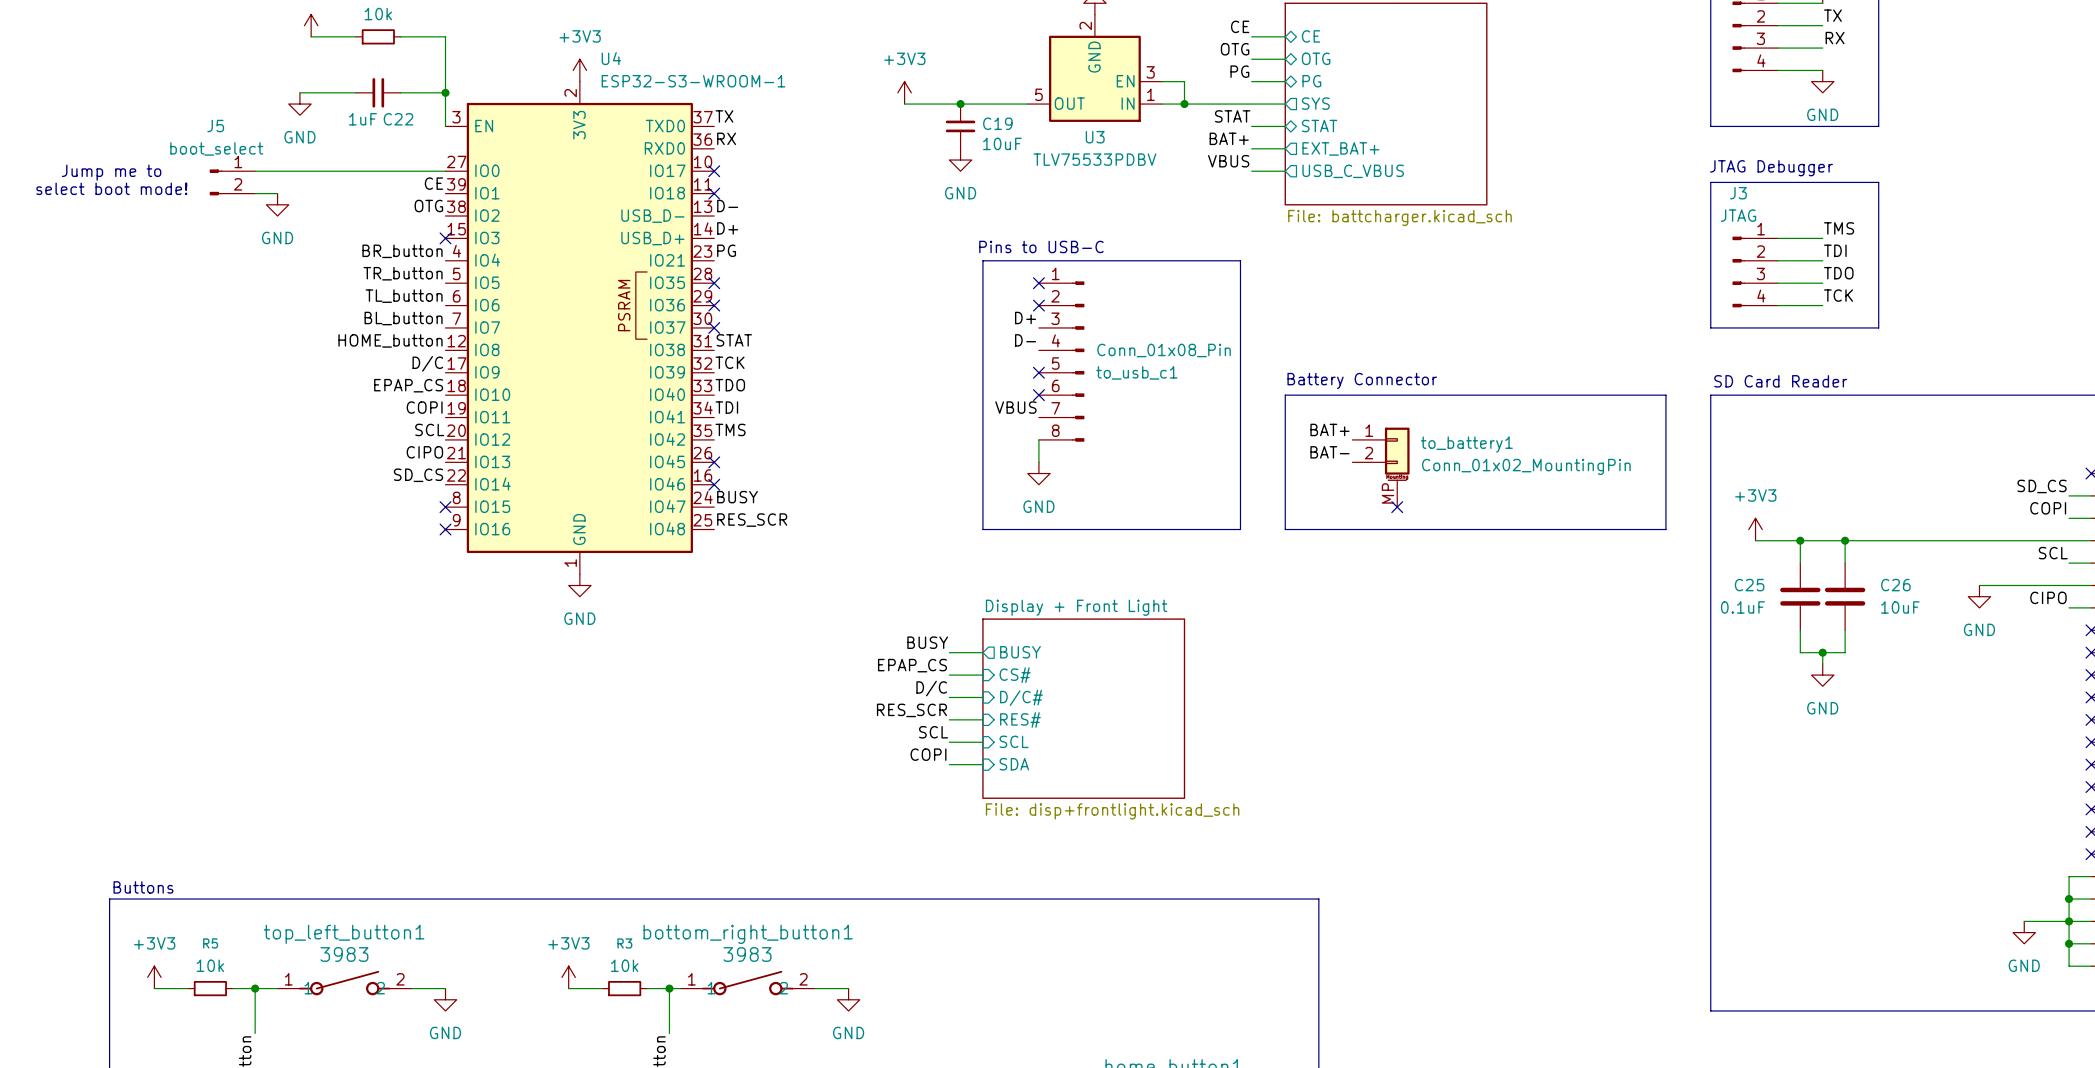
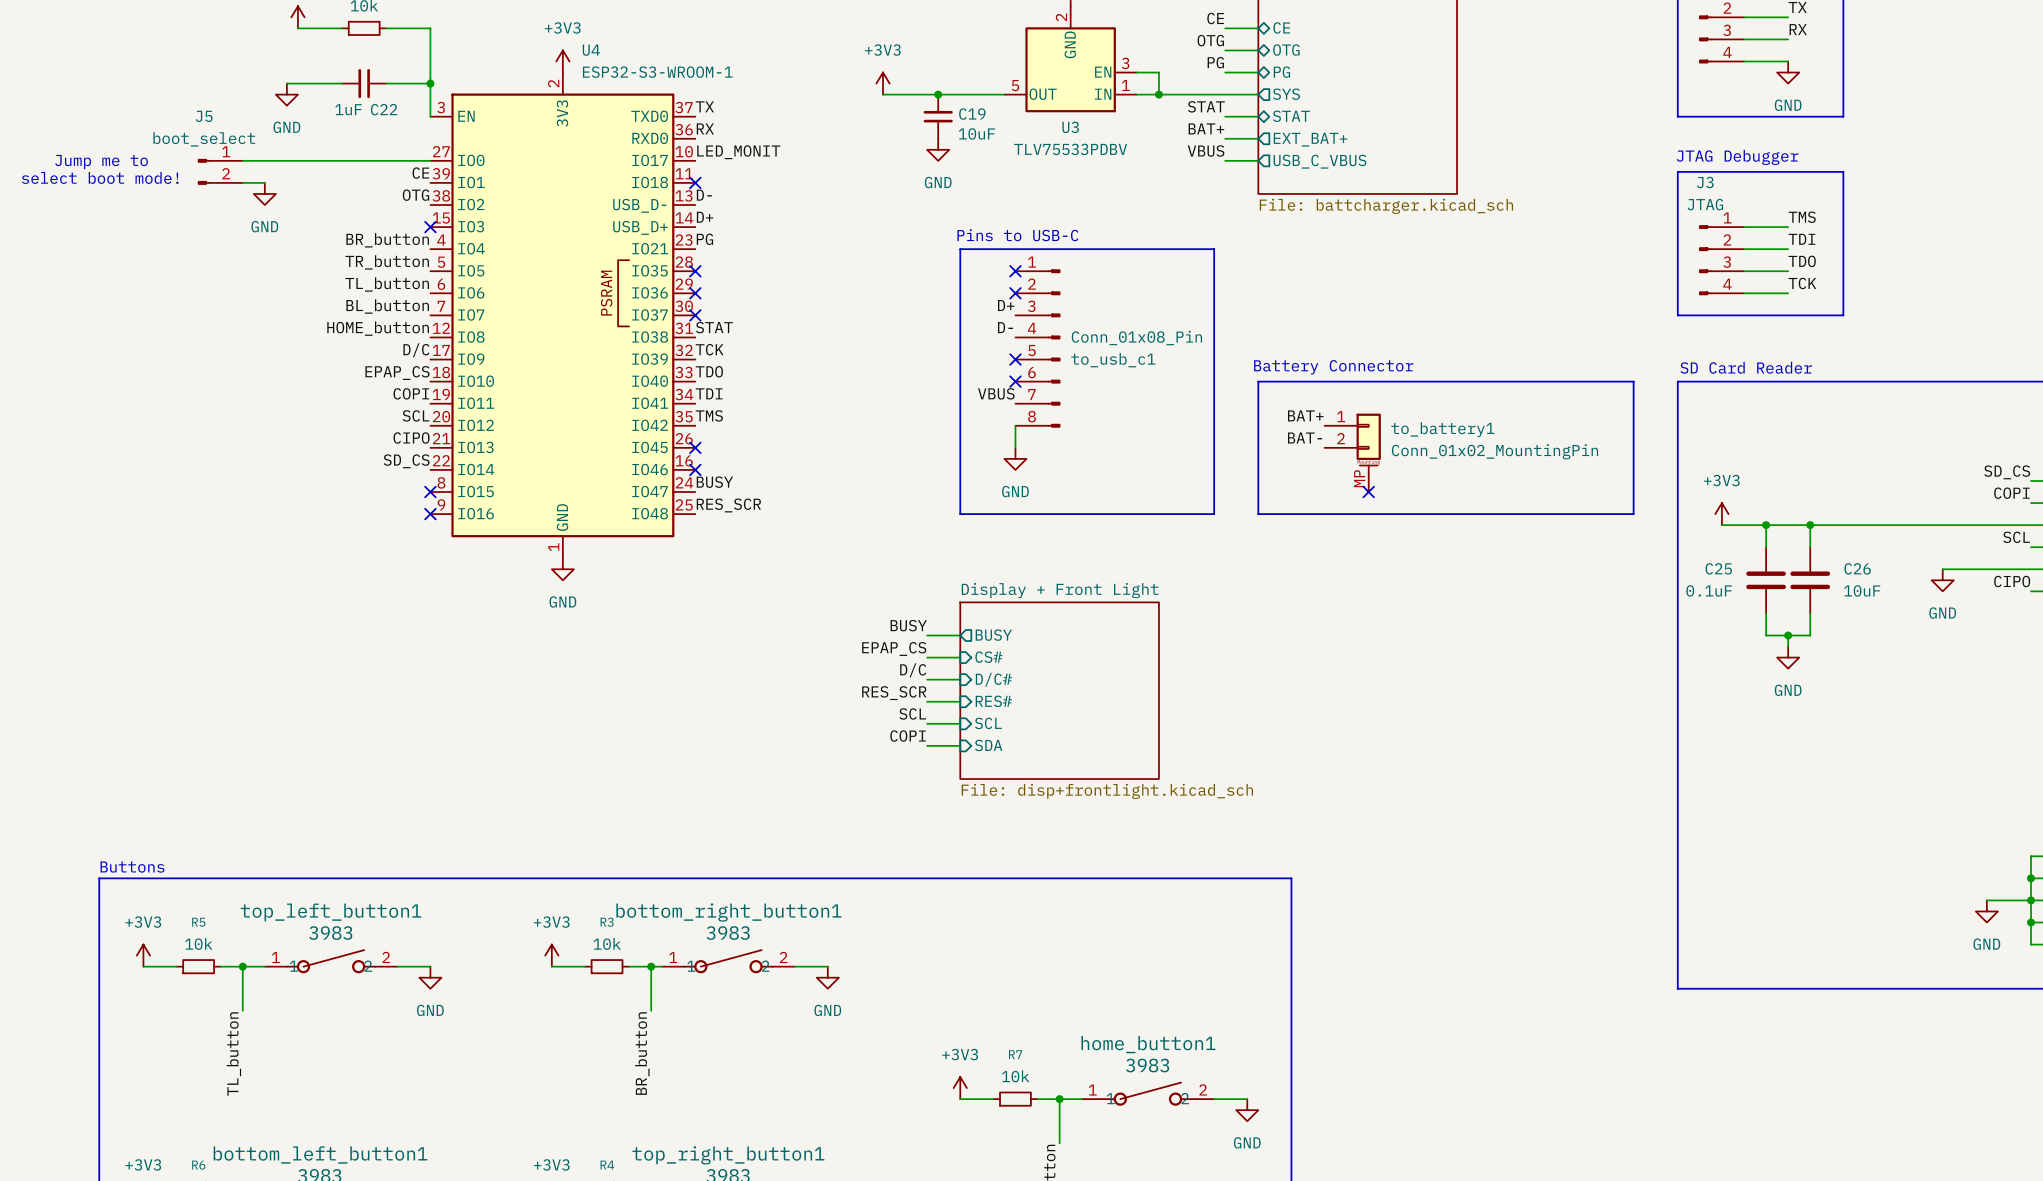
label: none -> LED_MONIT (738, 152)
no-connect mark: (714, 171) -> none

